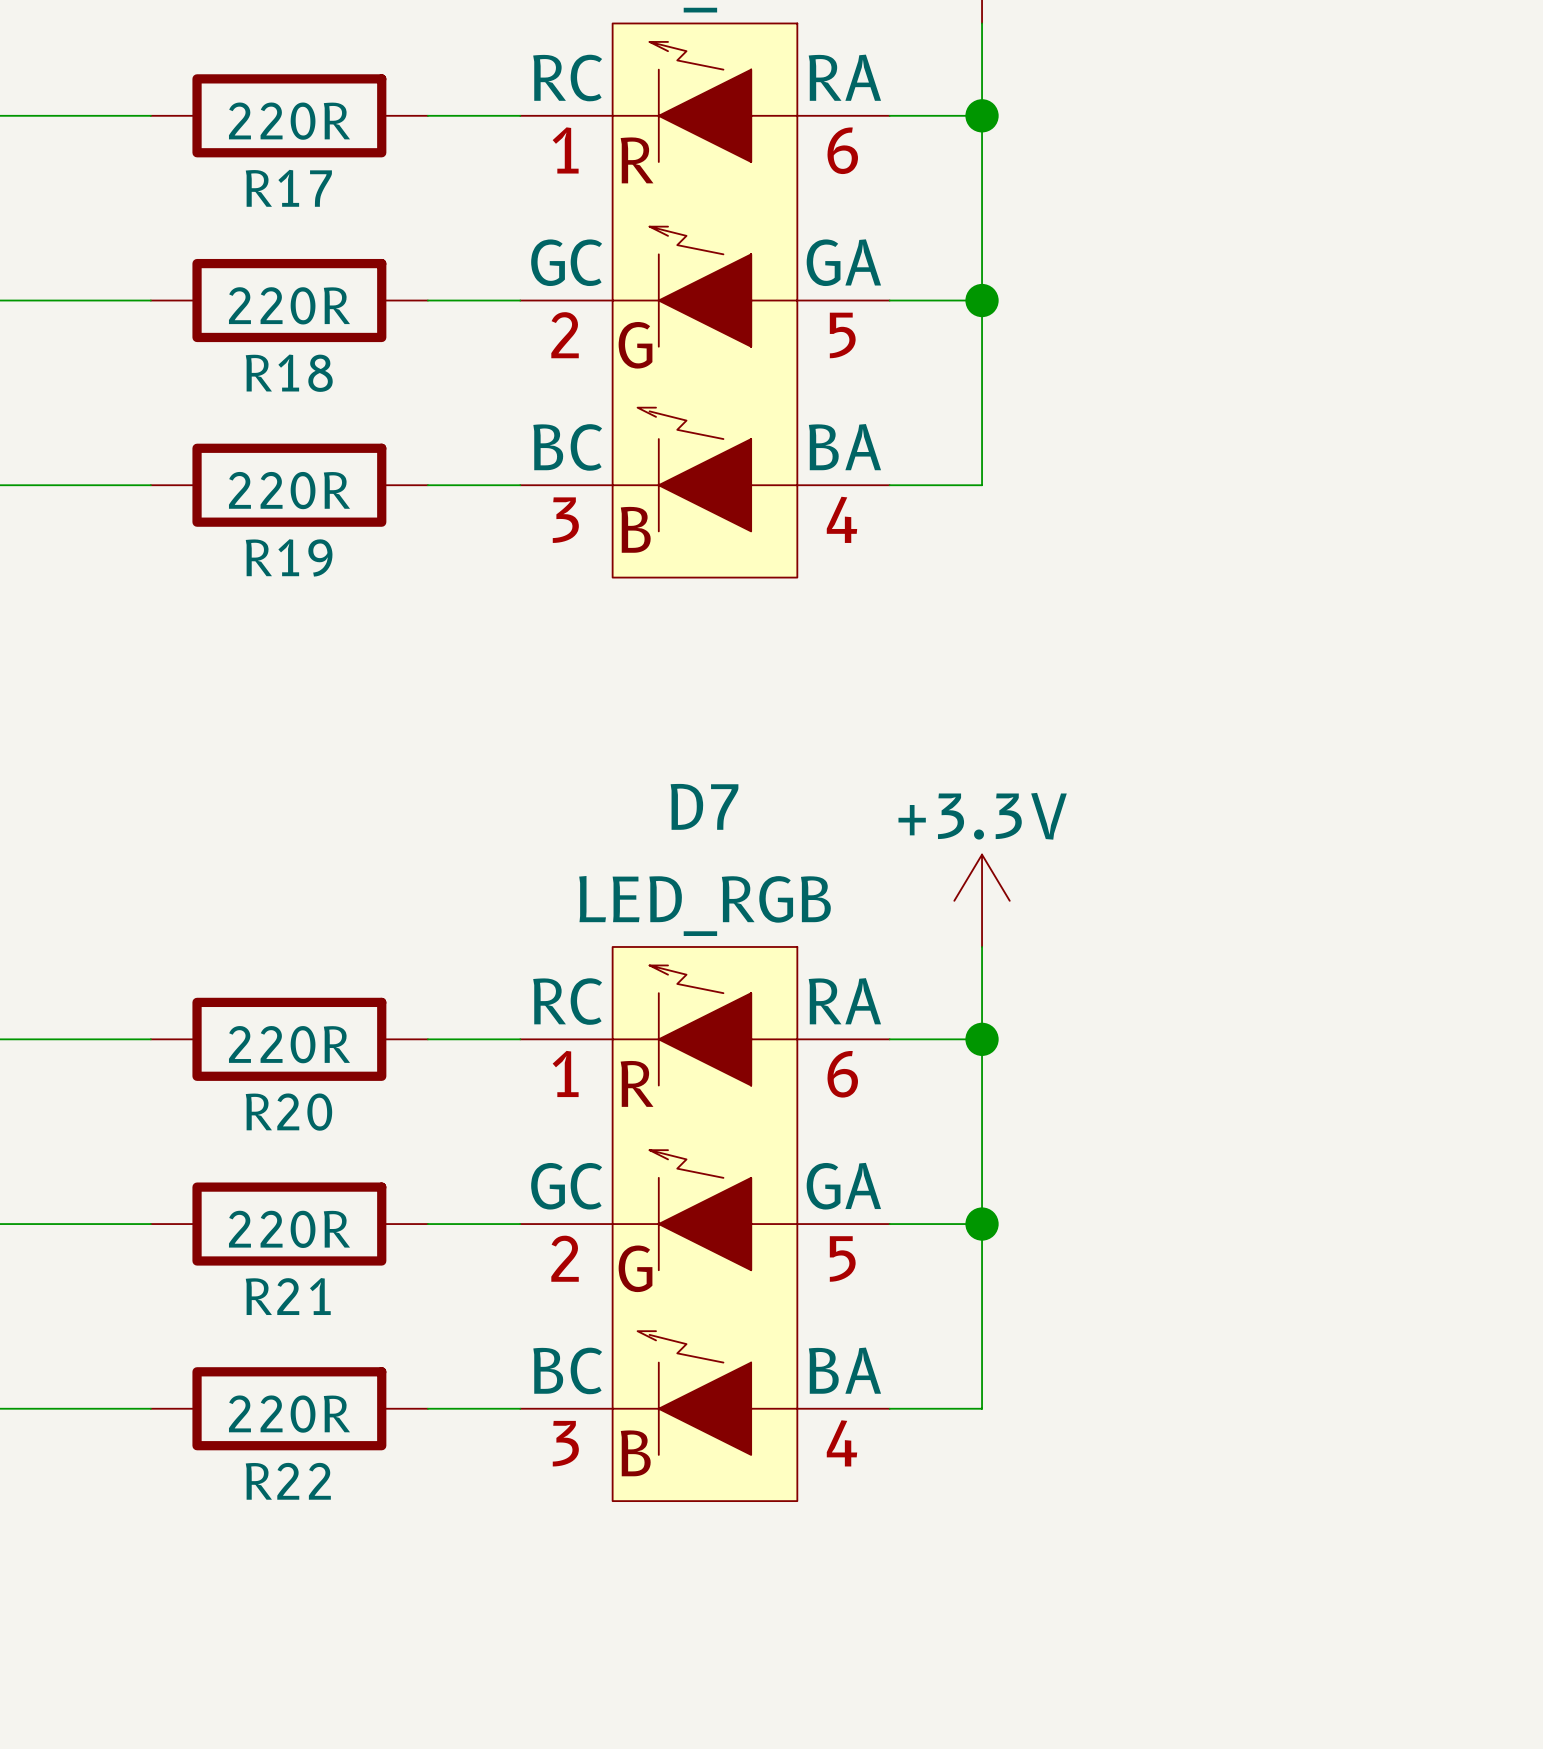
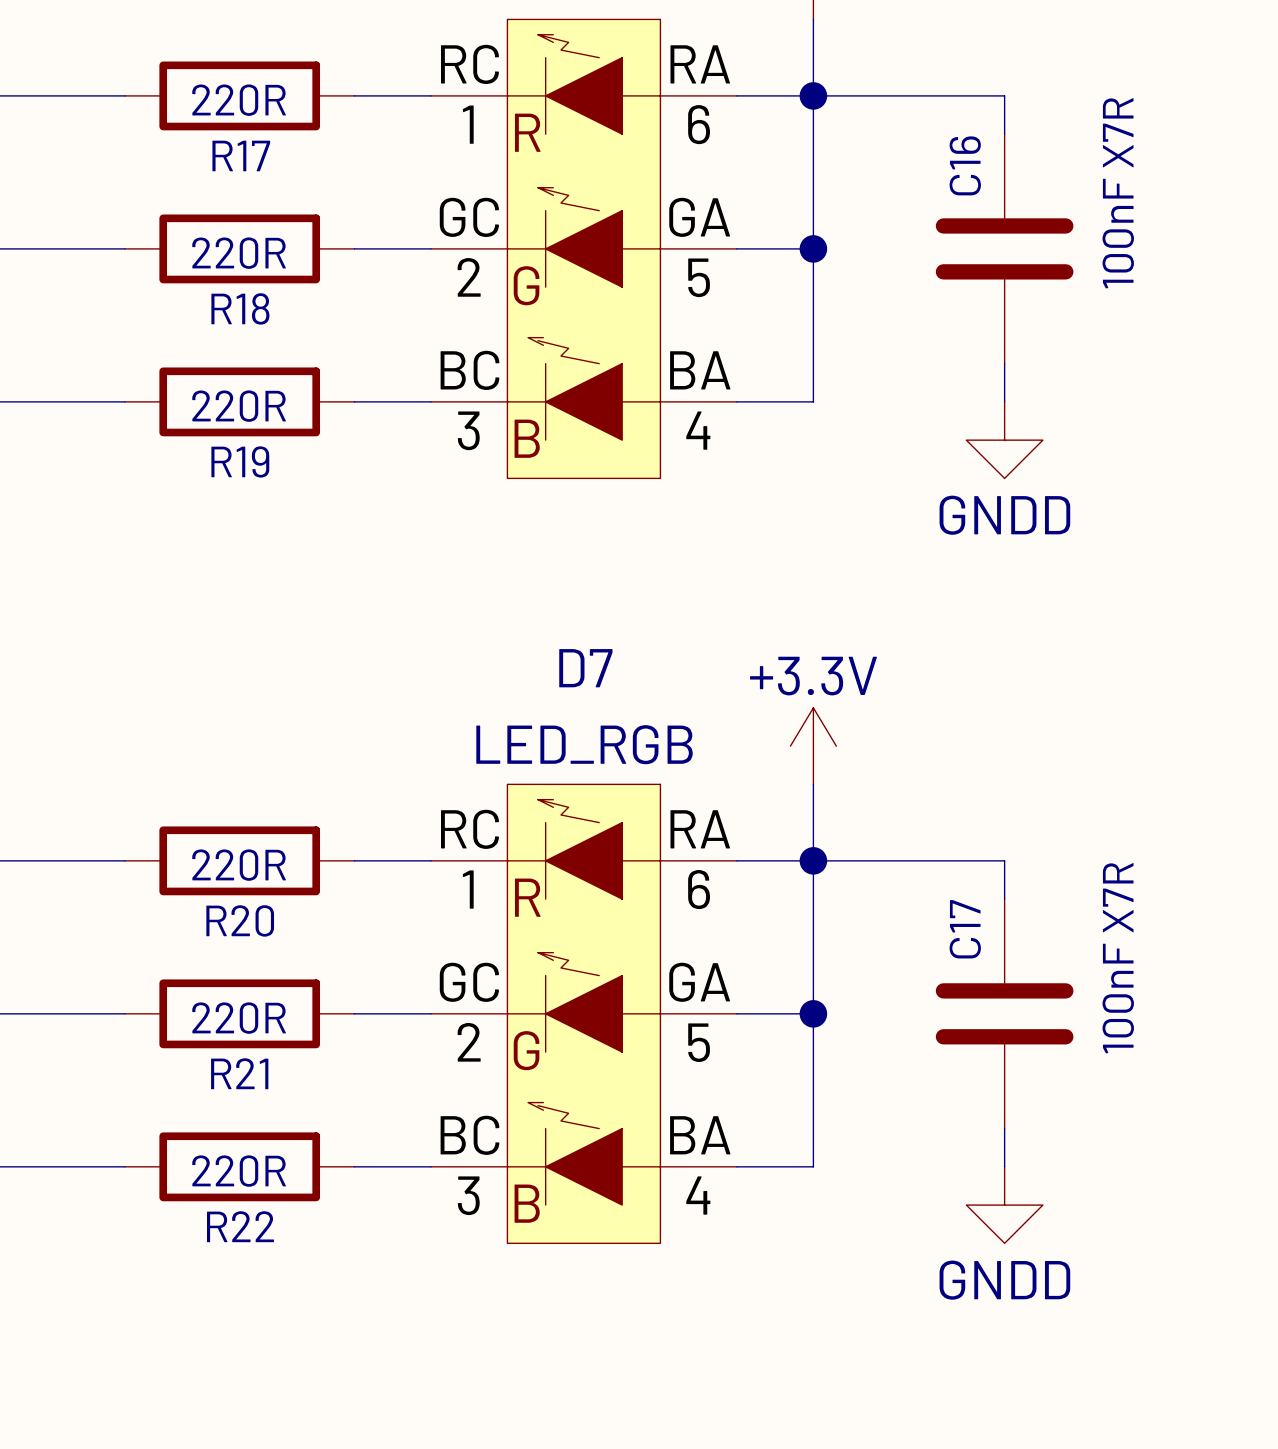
wire: none -> (813, 95) (1004, 95) (1004, 134)
C16: none -> 100nF X7R (1004, 248)
wire: none -> (1004, 363) (1004, 401)
power symbol: none -> GNDD (1004, 440)
wire: none -> (813, 860) (1004, 860) (1004, 899)
C17: none -> 100nF X7R (1004, 1013)
wire: none -> (1004, 1128) (1004, 1166)
power symbol: none -> GNDD (1004, 1205)

